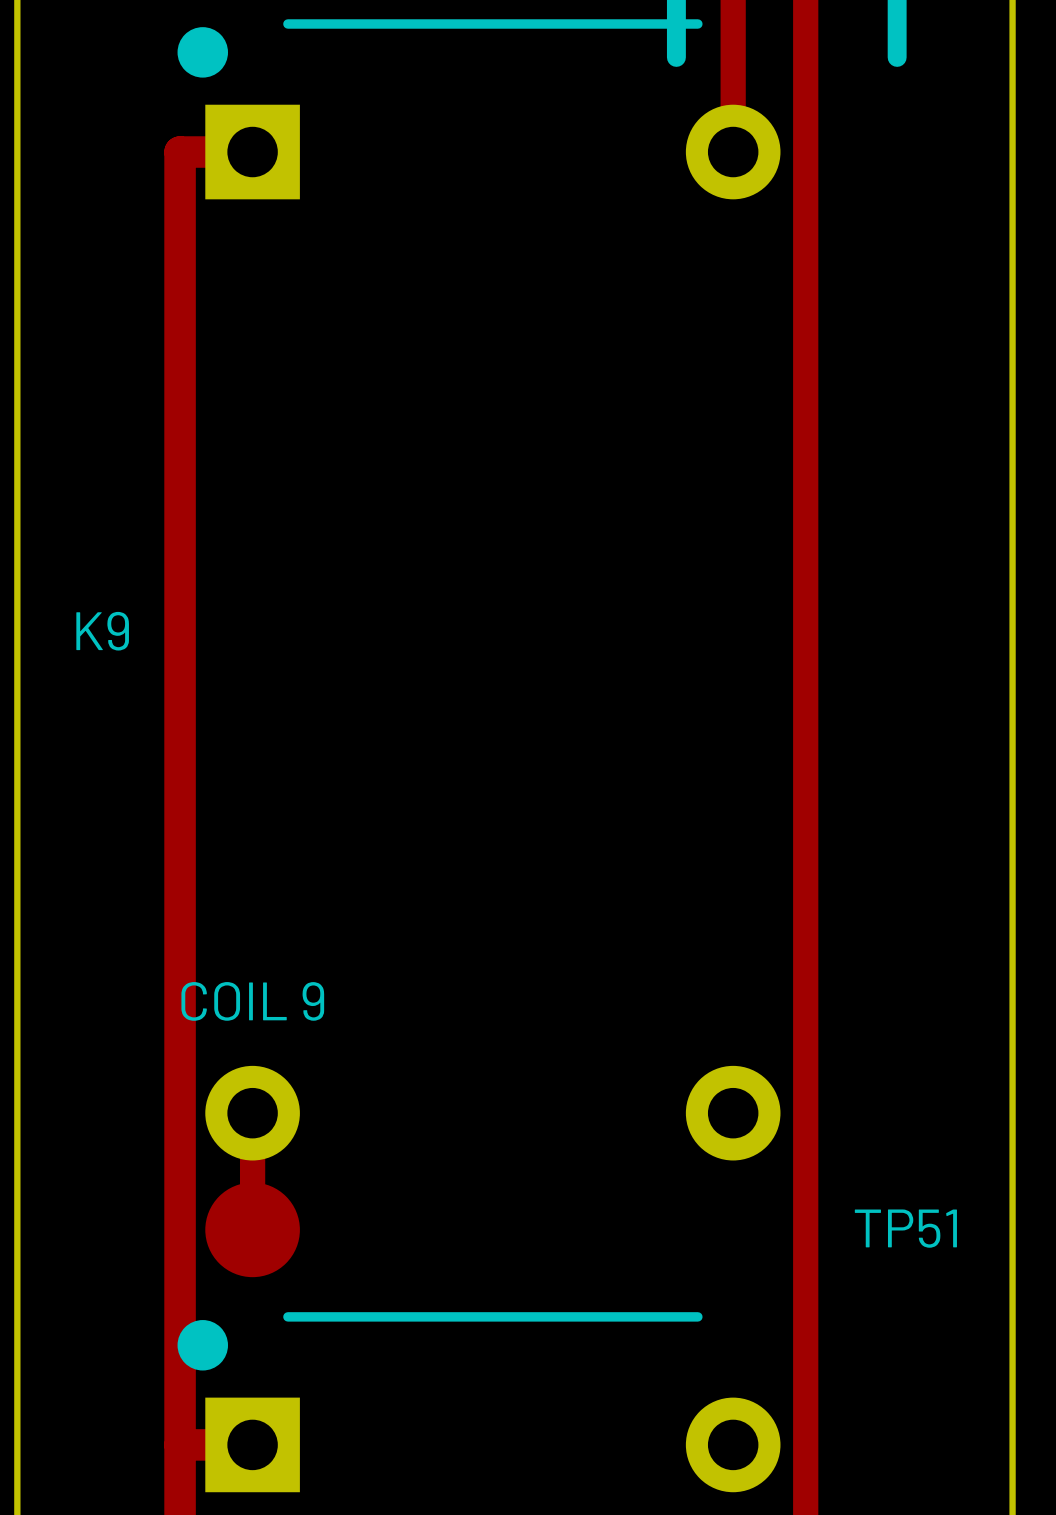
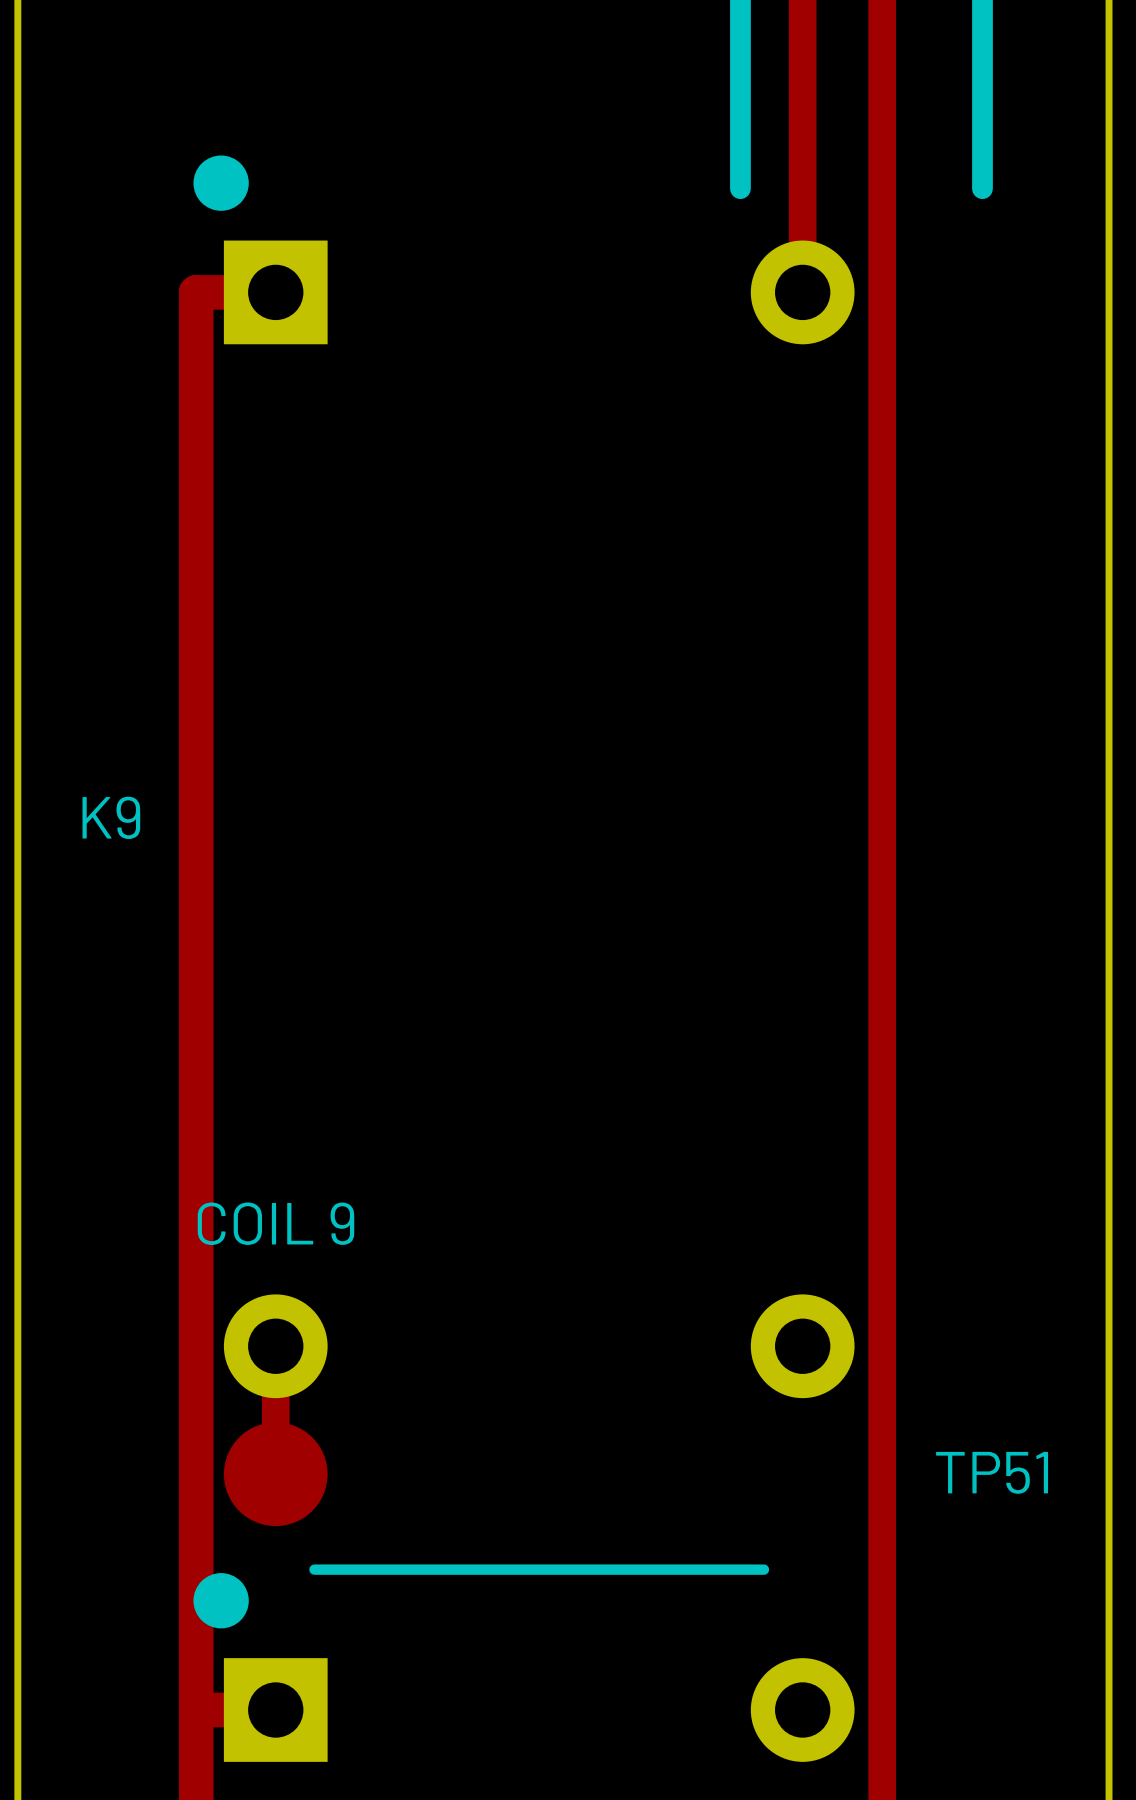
K9 footprint: [177, 19, 781, 1161] -> [193, 155, 855, 1399]

